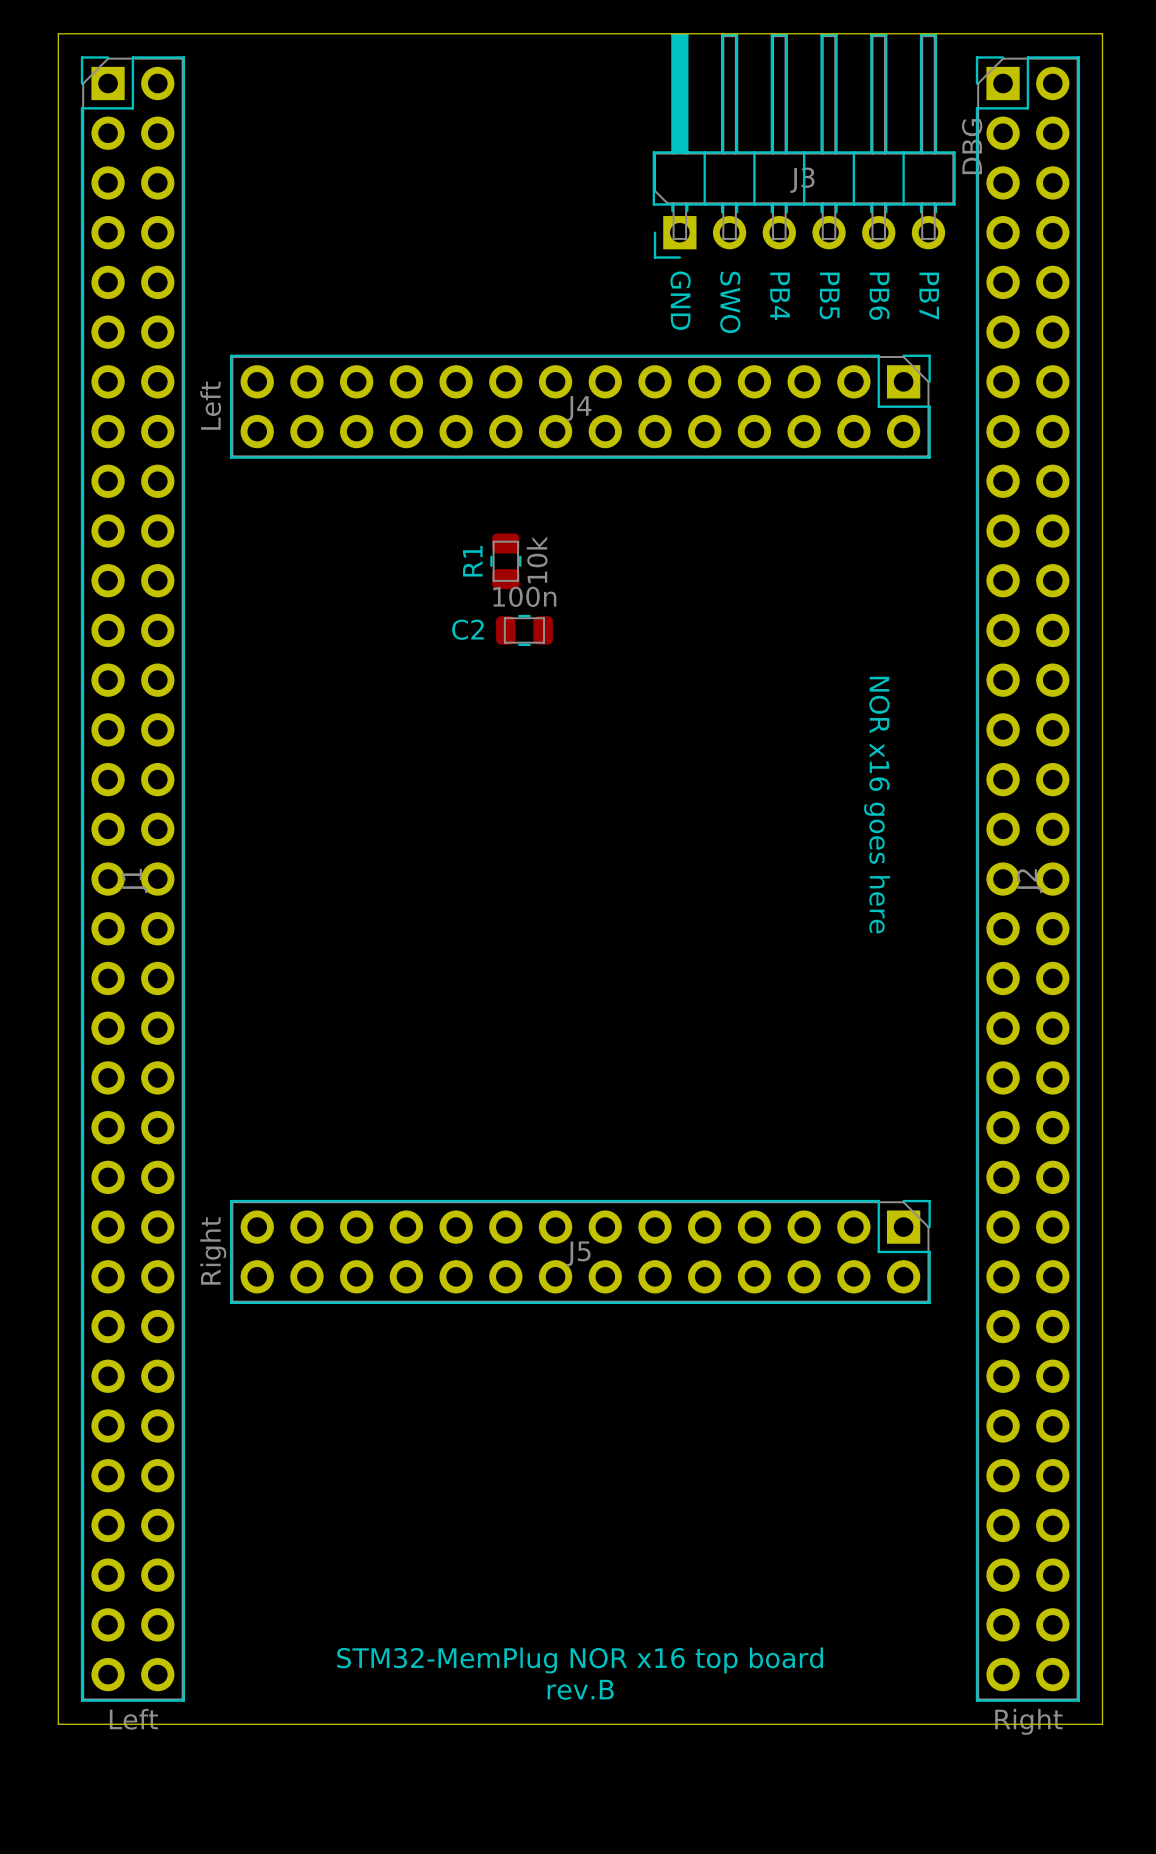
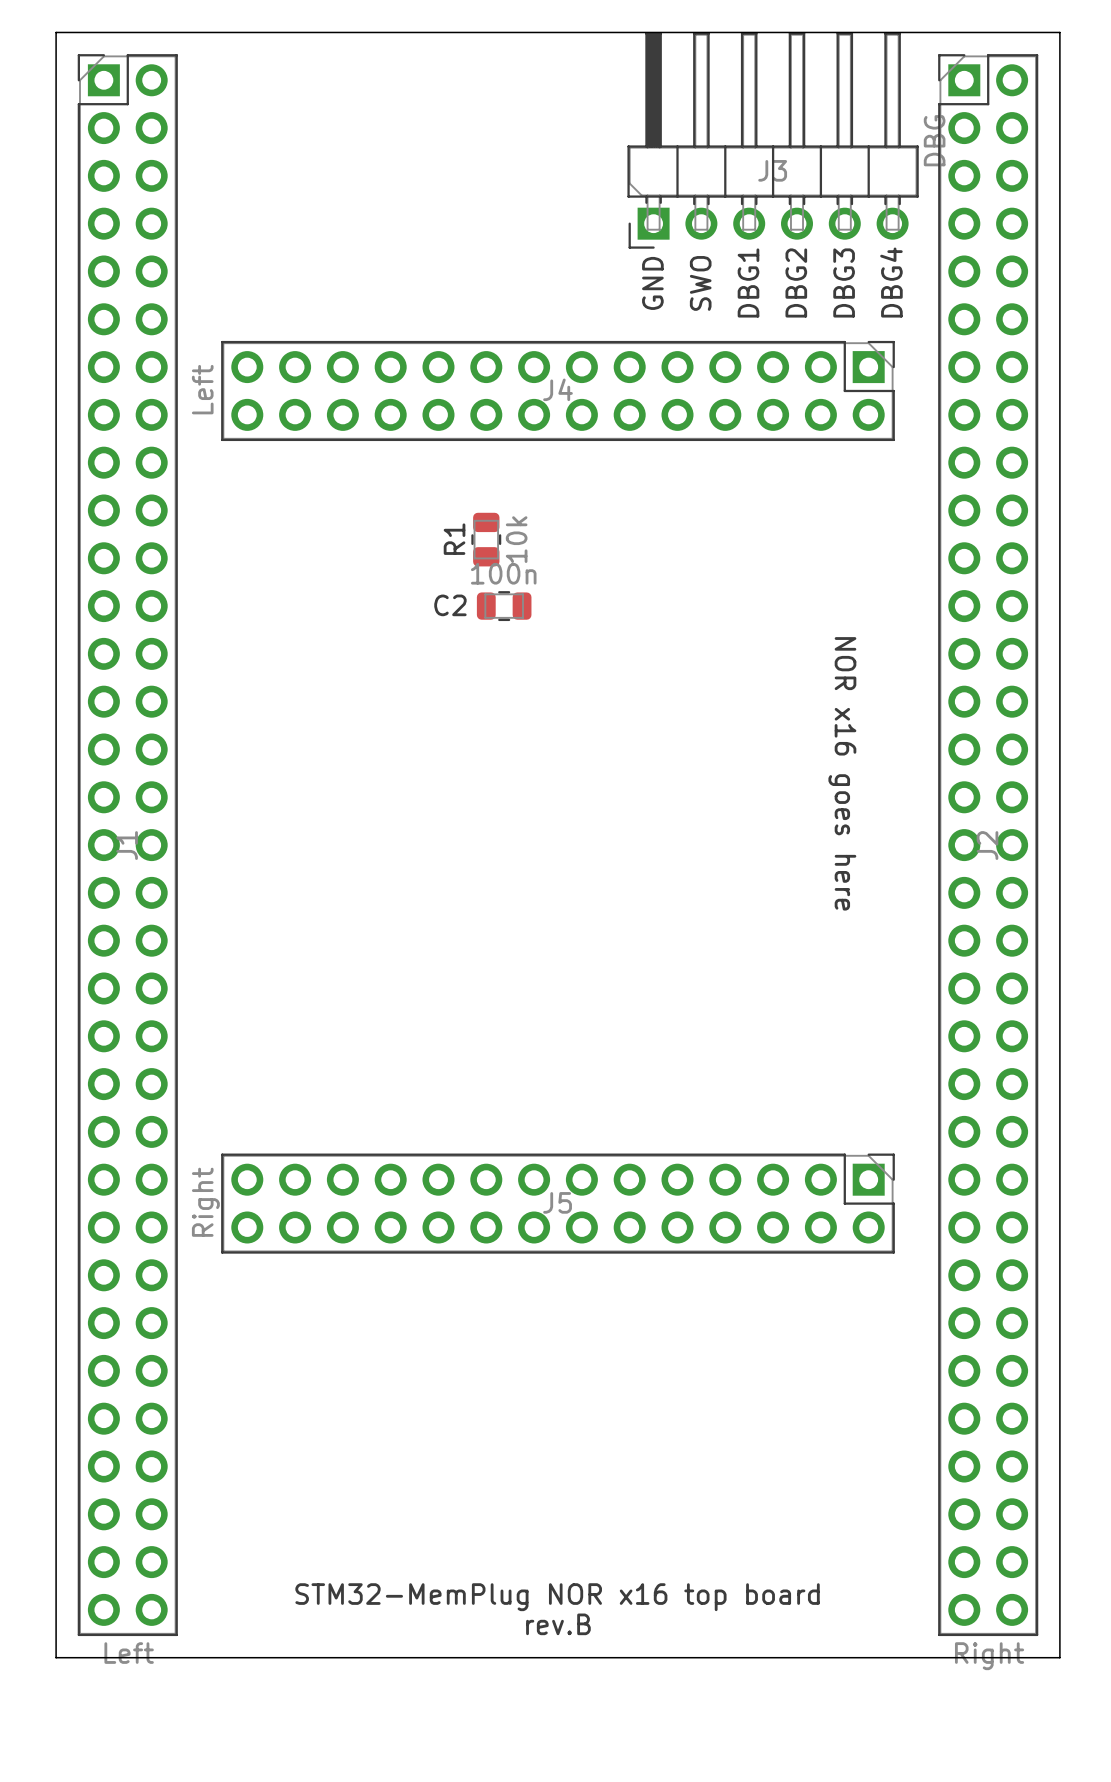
text: none -> DBG1 (748, 282)
text: none -> DBG2 (796, 282)
text: none -> DBG3 (844, 282)
text: none -> DBG4 (891, 282)
text: PB5 (829, 295) -> none
text: PB7 (929, 295) -> none
text: PB4 (780, 296) -> none
text: PB6 (879, 296) -> none
text rotation: 0° (680, 300) -> 180° (652, 283)
text rotation: 0° (730, 302) -> 180° (700, 283)

